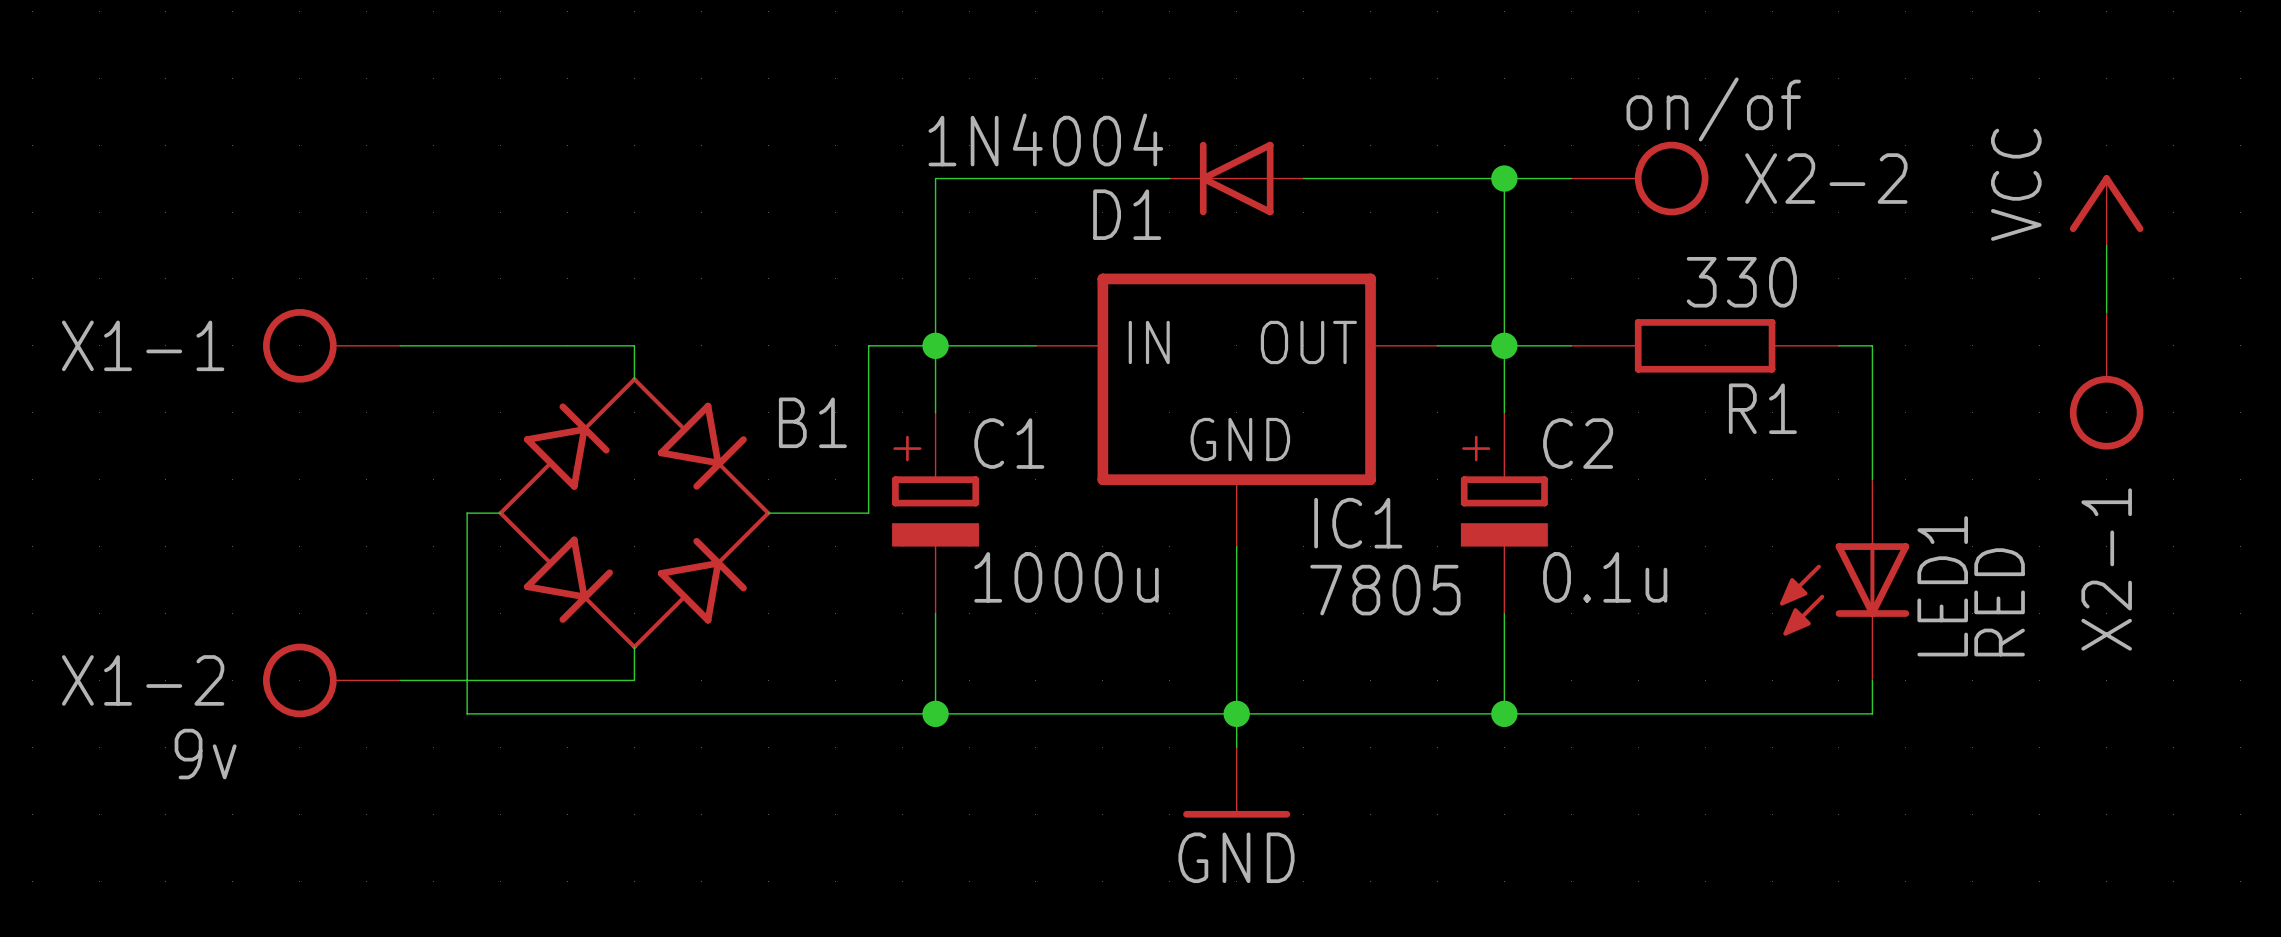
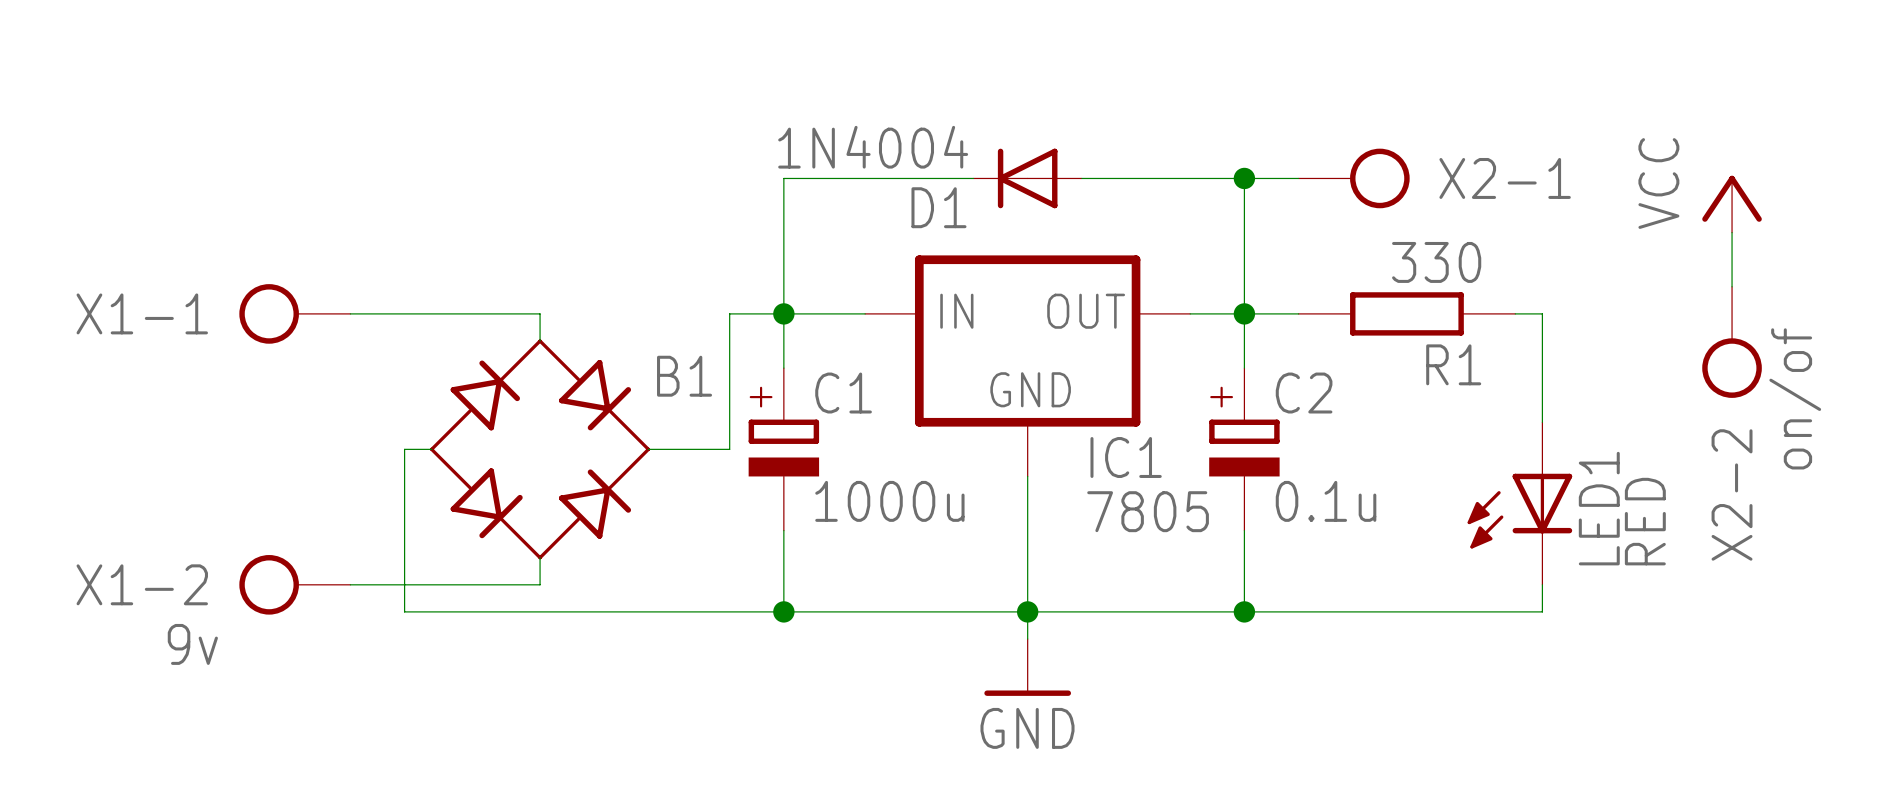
X2-2 value: on/of (1713, 109) -> none
X2-2 name: X2-2 (1826, 178) -> X2-1 (1505, 178)
X2-1 value: none -> on/of (1795, 398)
X2-1 name: X2-1 (2106, 569) -> X2-2 (1732, 494)

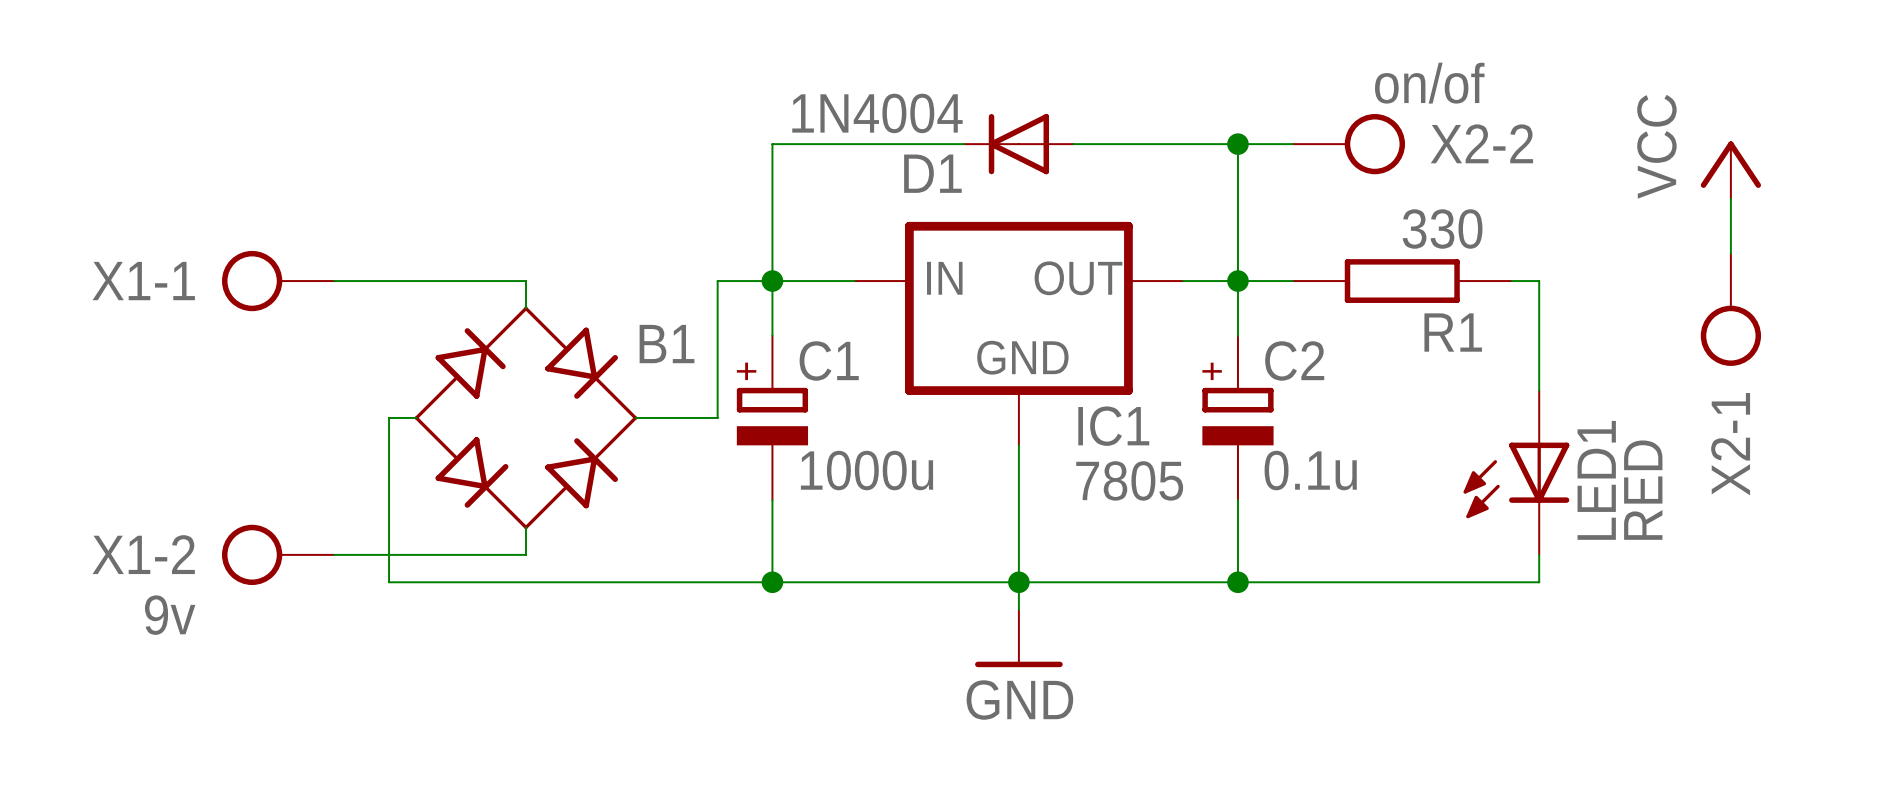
X2-1 value: none -> on/of (1429, 83)
X2-1 name: X2-1 (1505, 178) -> X2-2 (1481, 143)
X2-2 value: on/of (1795, 398) -> none
X2-2 name: X2-2 (1732, 494) -> X2-1 (1730, 444)

